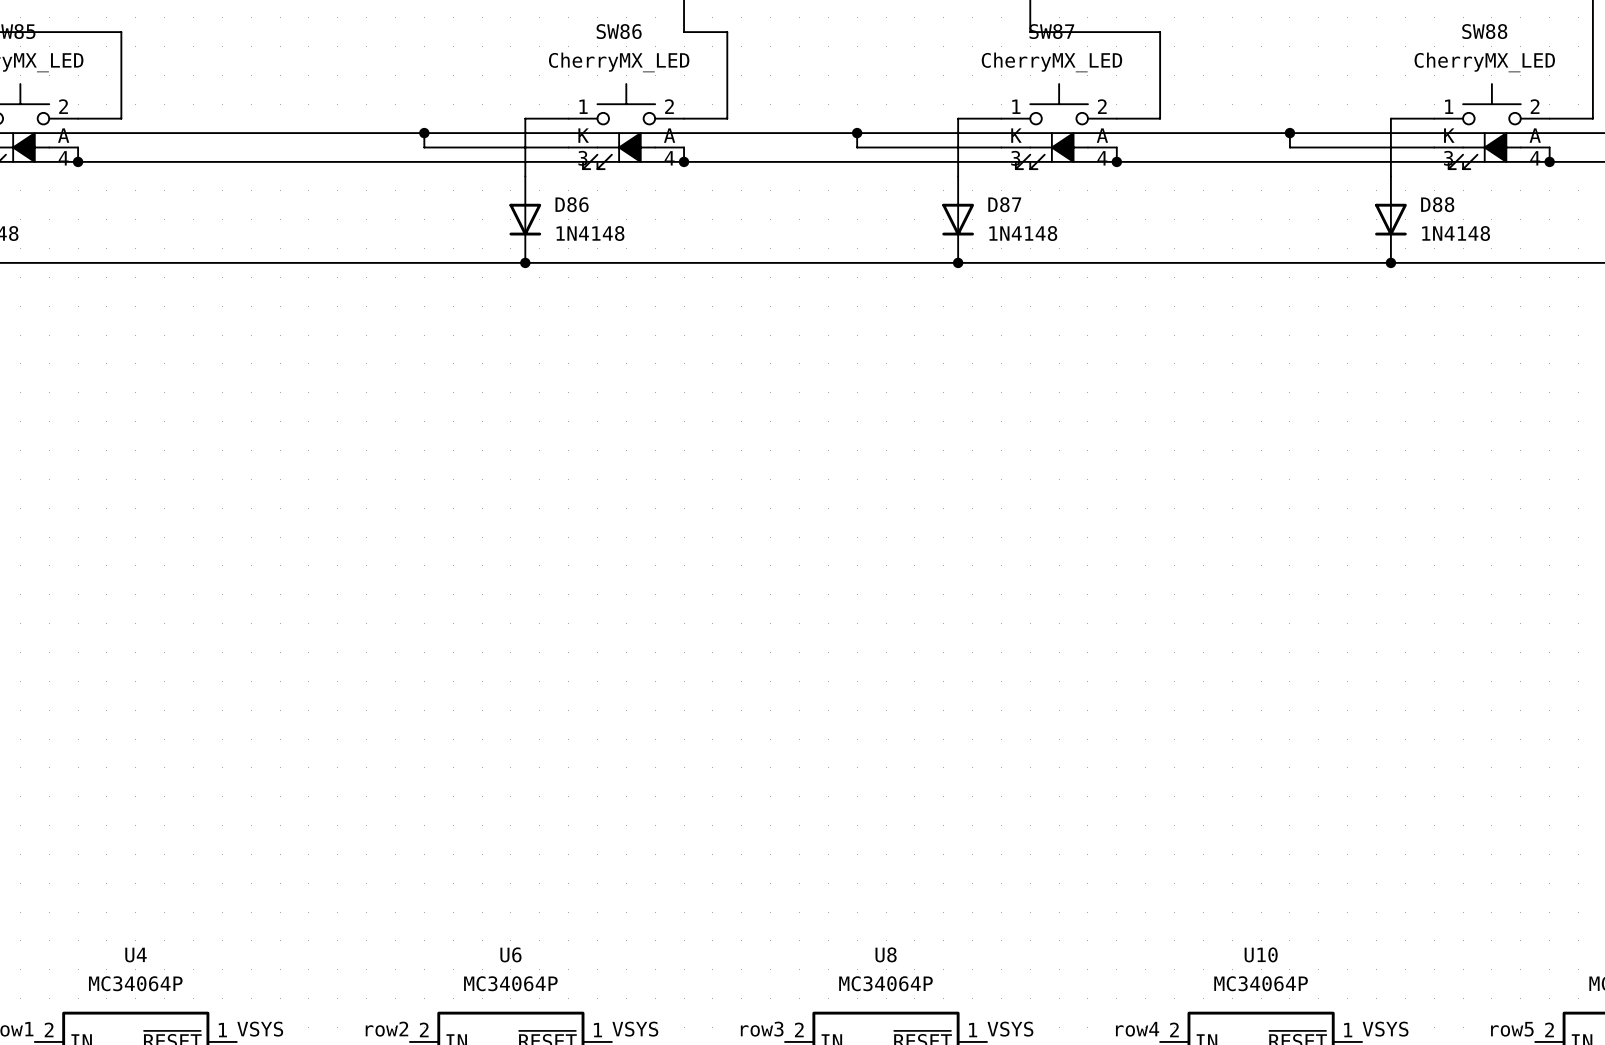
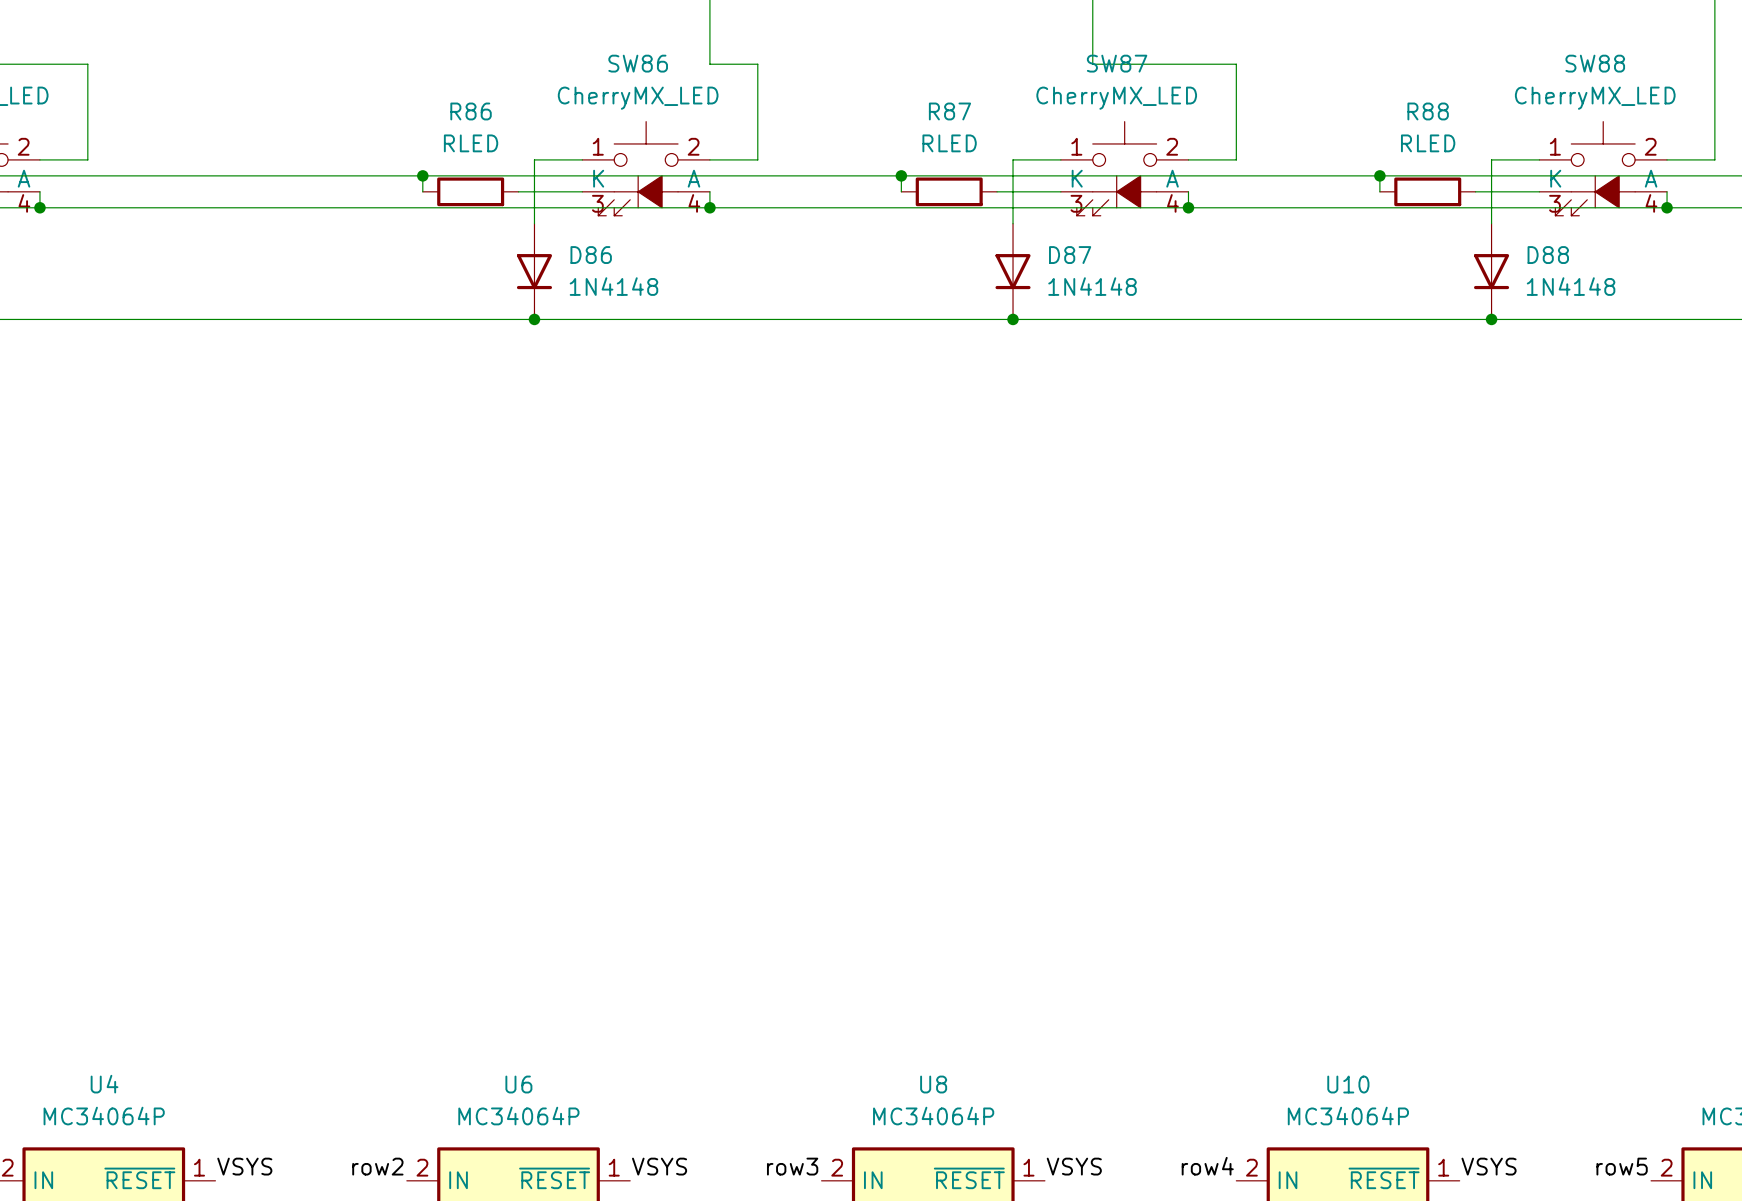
wire: (424, 147) (510, 147) -> none
R86: none -> RLED (470, 191)
wire: (857, 147) (943, 147) -> none
R87: none -> RLED (949, 191)
wire: (1289, 147) (1376, 147) -> none
R88: none -> RLED (1427, 191)

